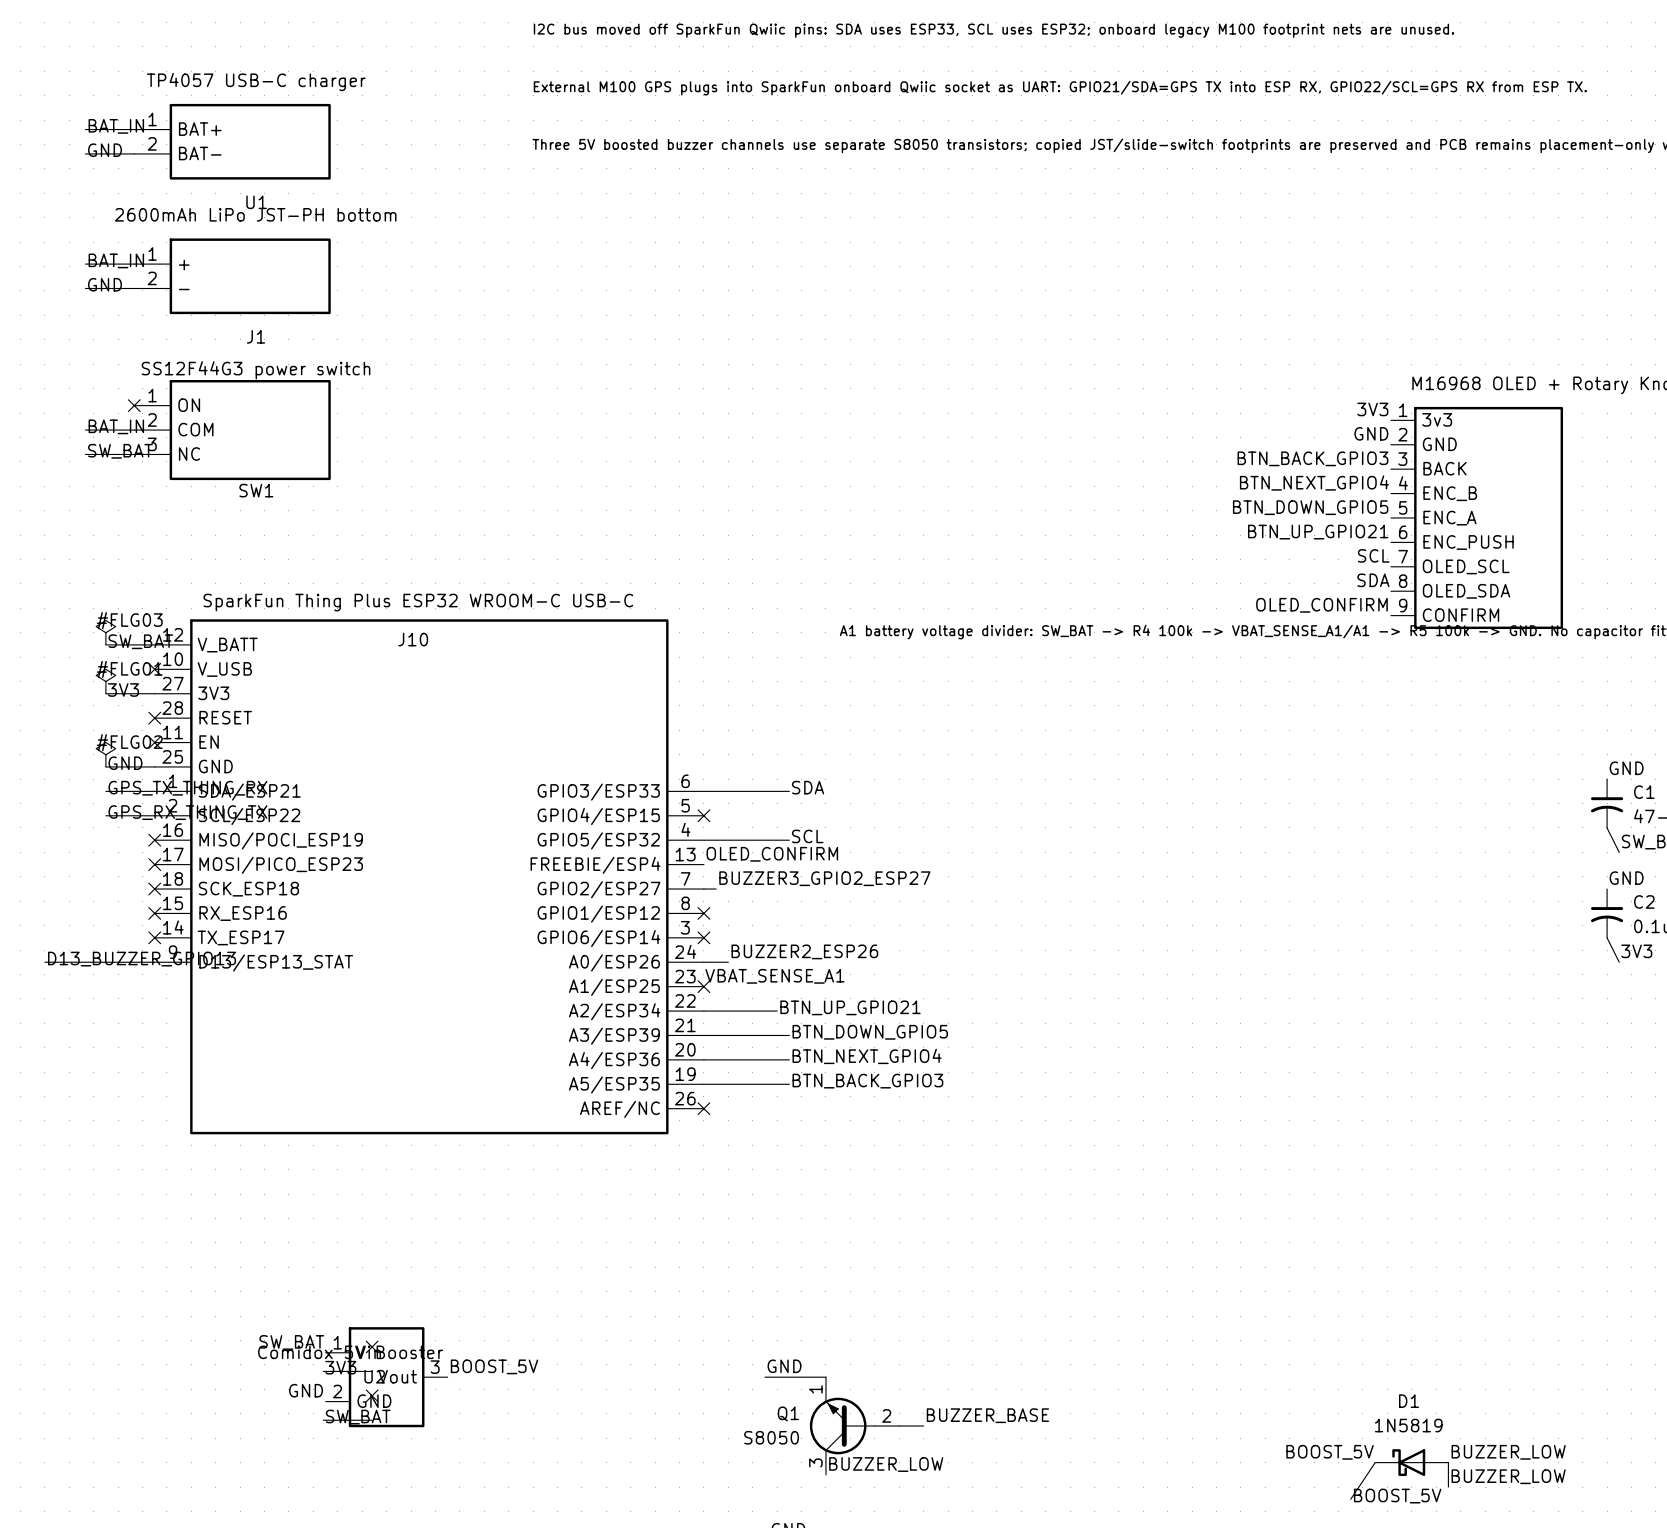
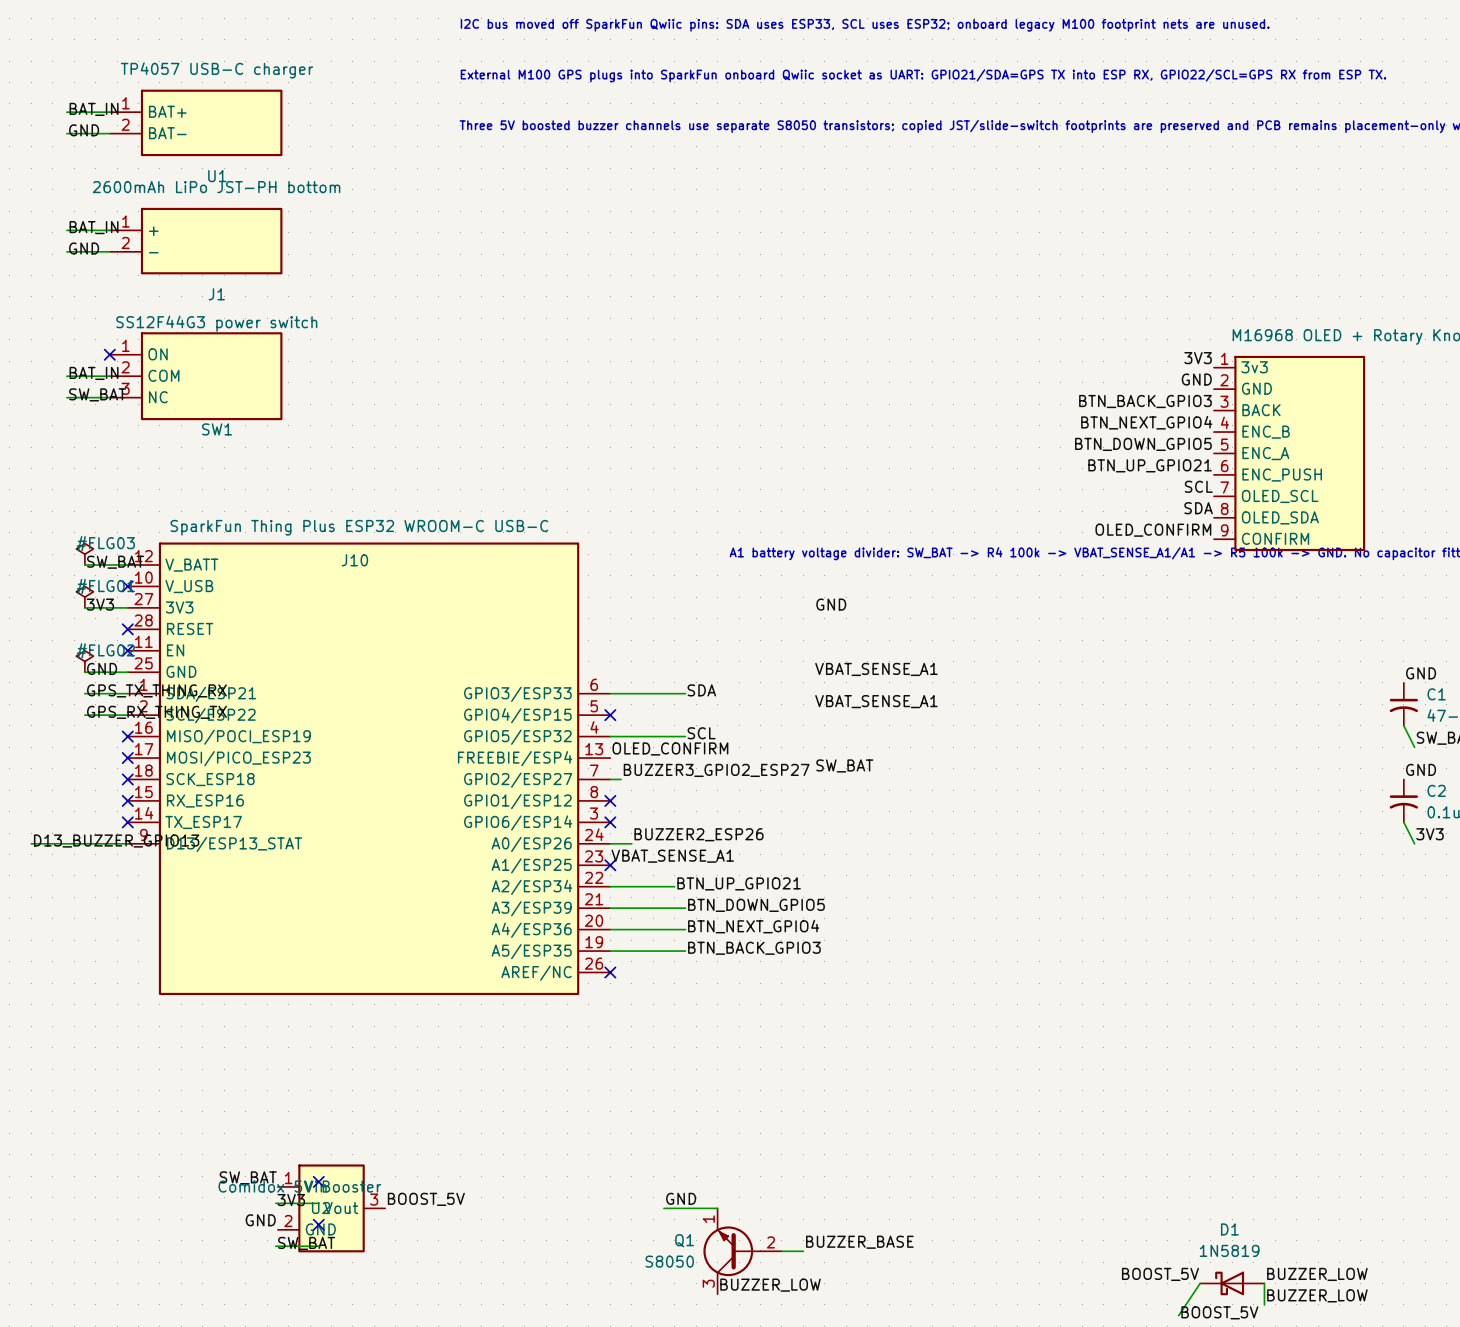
label: none -> GND (831, 604)
label: none -> VBAT_SENSE_A1 (876, 669)
label: none -> VBAT_SENSE_A1 (876, 701)
label: none -> SW_BAT (844, 765)

